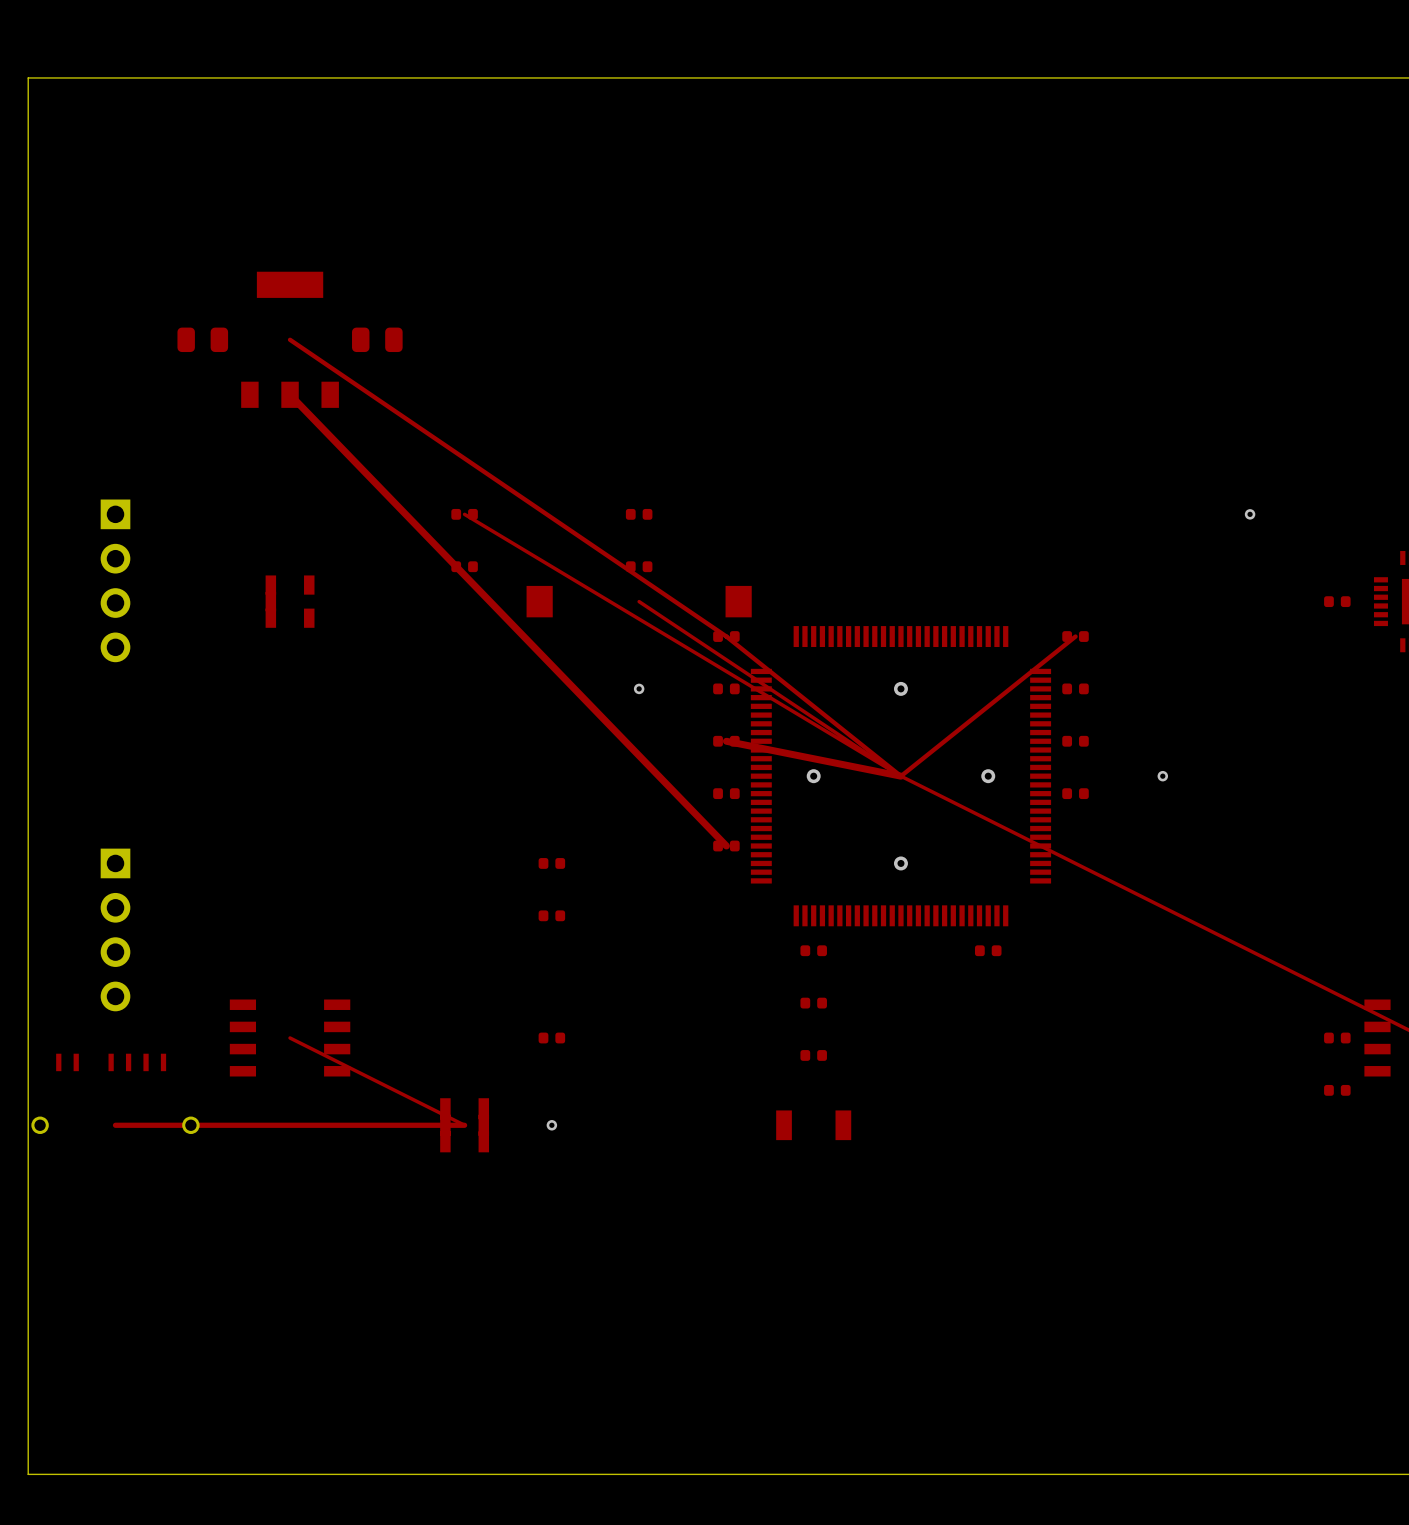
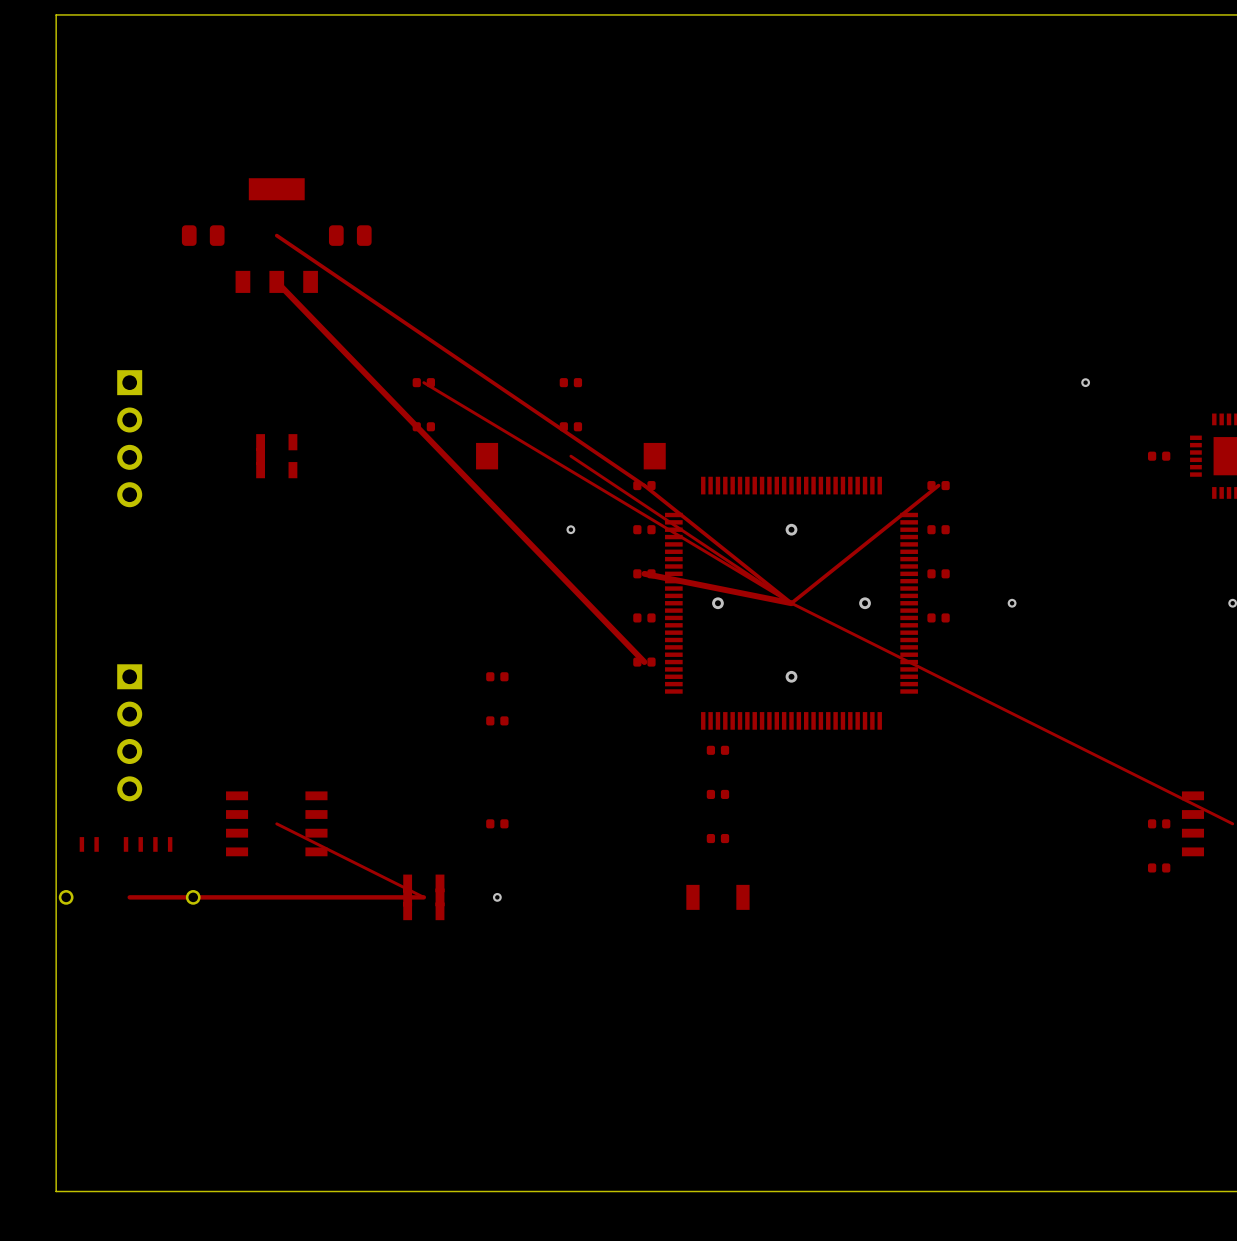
part: (988, 950) -> none

